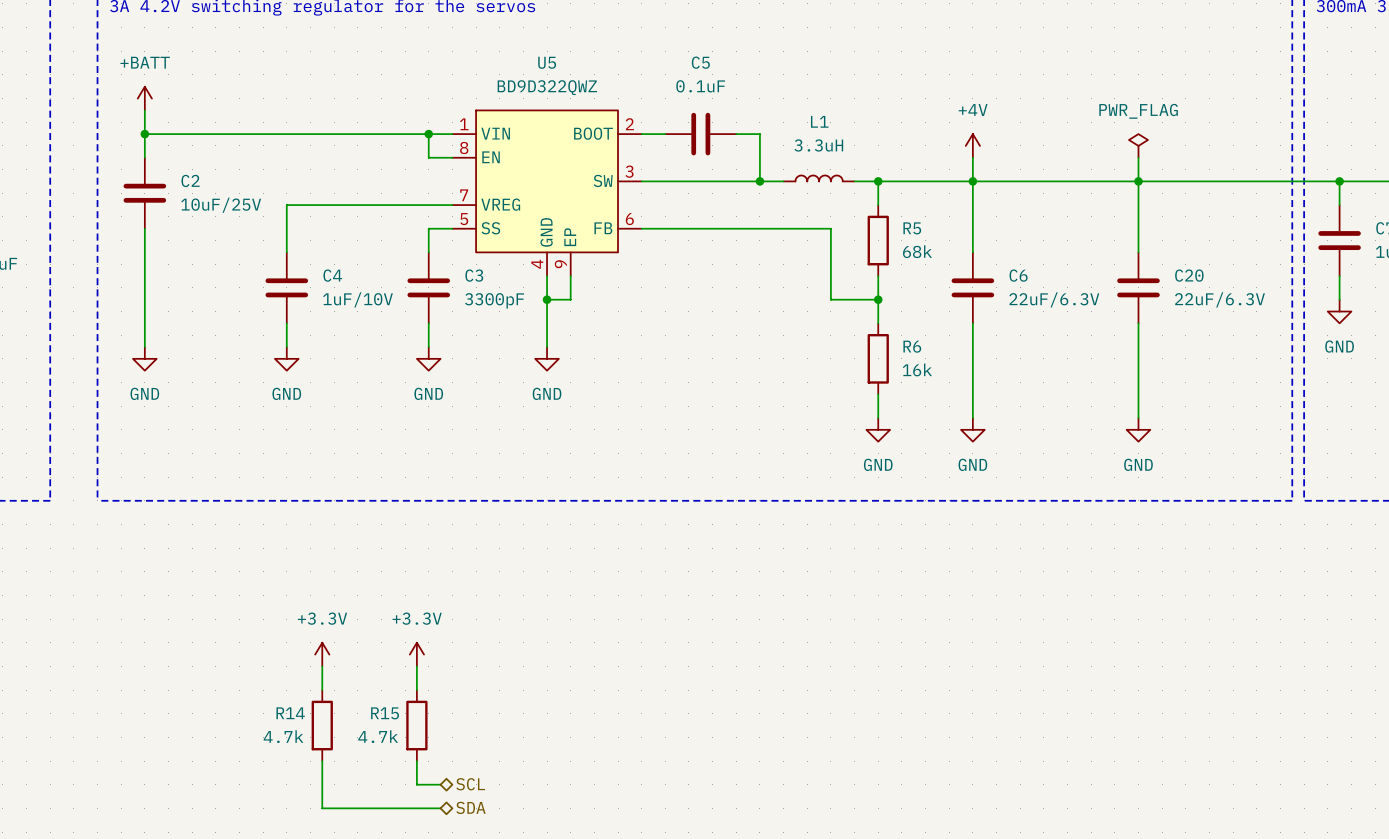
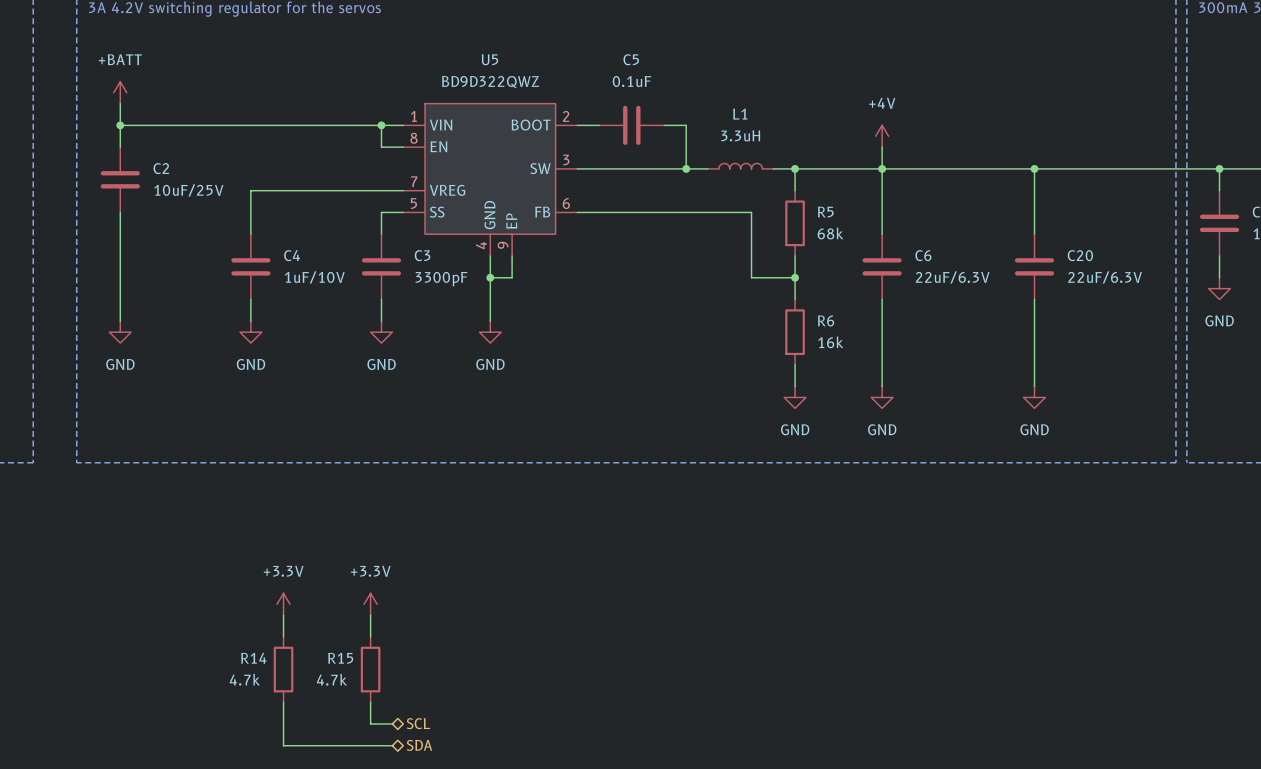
power symbol: PWR_FLAG (1138, 145) -> none
wire: (1138, 157) (1138, 181) -> none

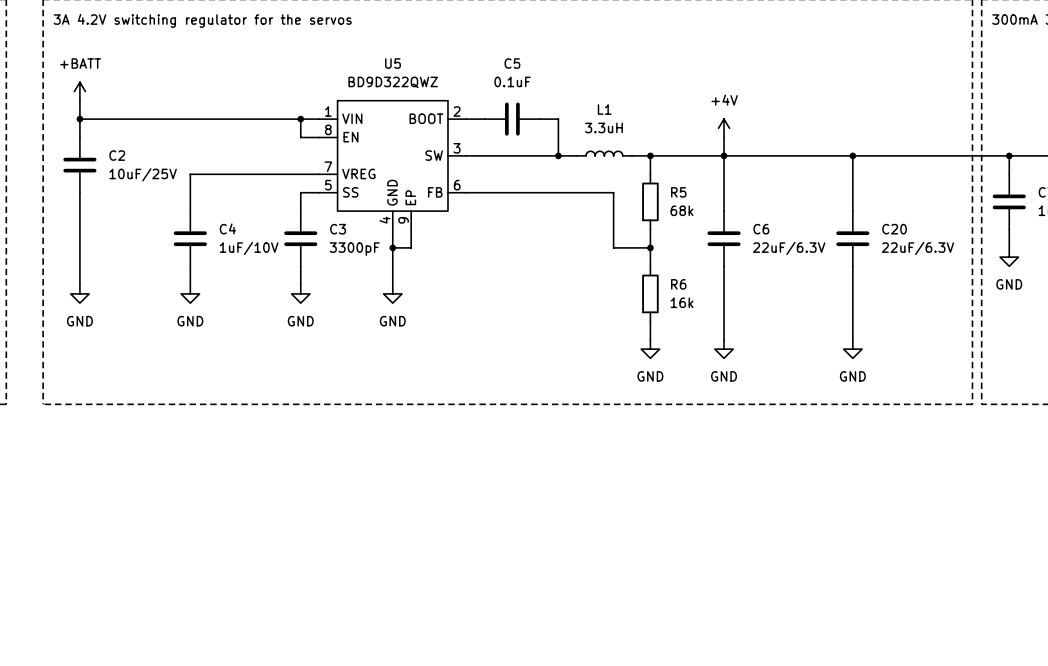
power symbol: +3.3V (283, 604) -> none
power symbol: +3.3V (370, 604) -> none
wire: (283, 615) (283, 636) -> none
wire: (370, 615) (370, 636) -> none
R14: 4.7k (283, 669) -> none
R15: 4.7k (370, 669) -> none
wire: (283, 702) (283, 745) (392, 745) -> none
wire: (370, 702) (370, 723) (392, 723) -> none
hierarchical label: SCL (418, 723) -> none
hierarchical label: SDA (419, 745) -> none

